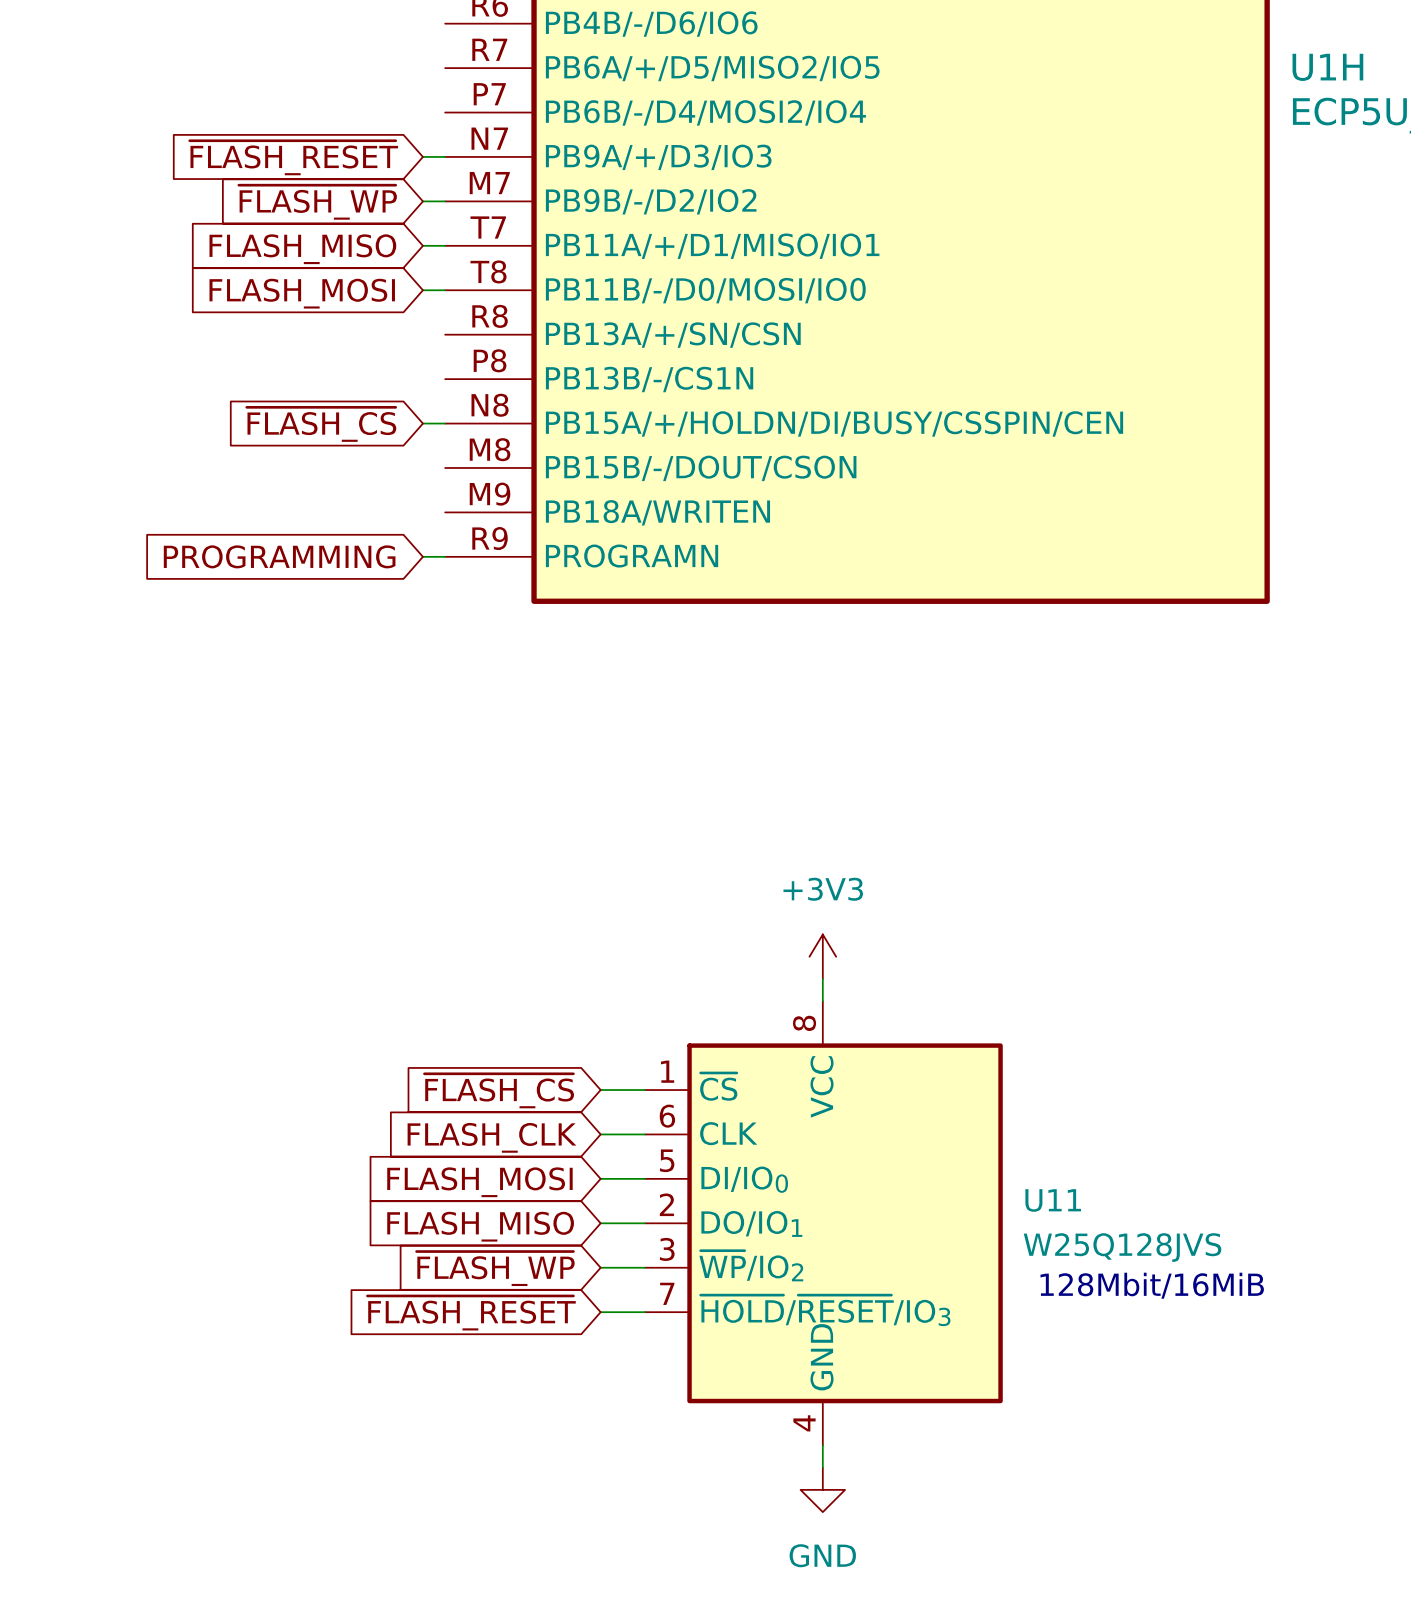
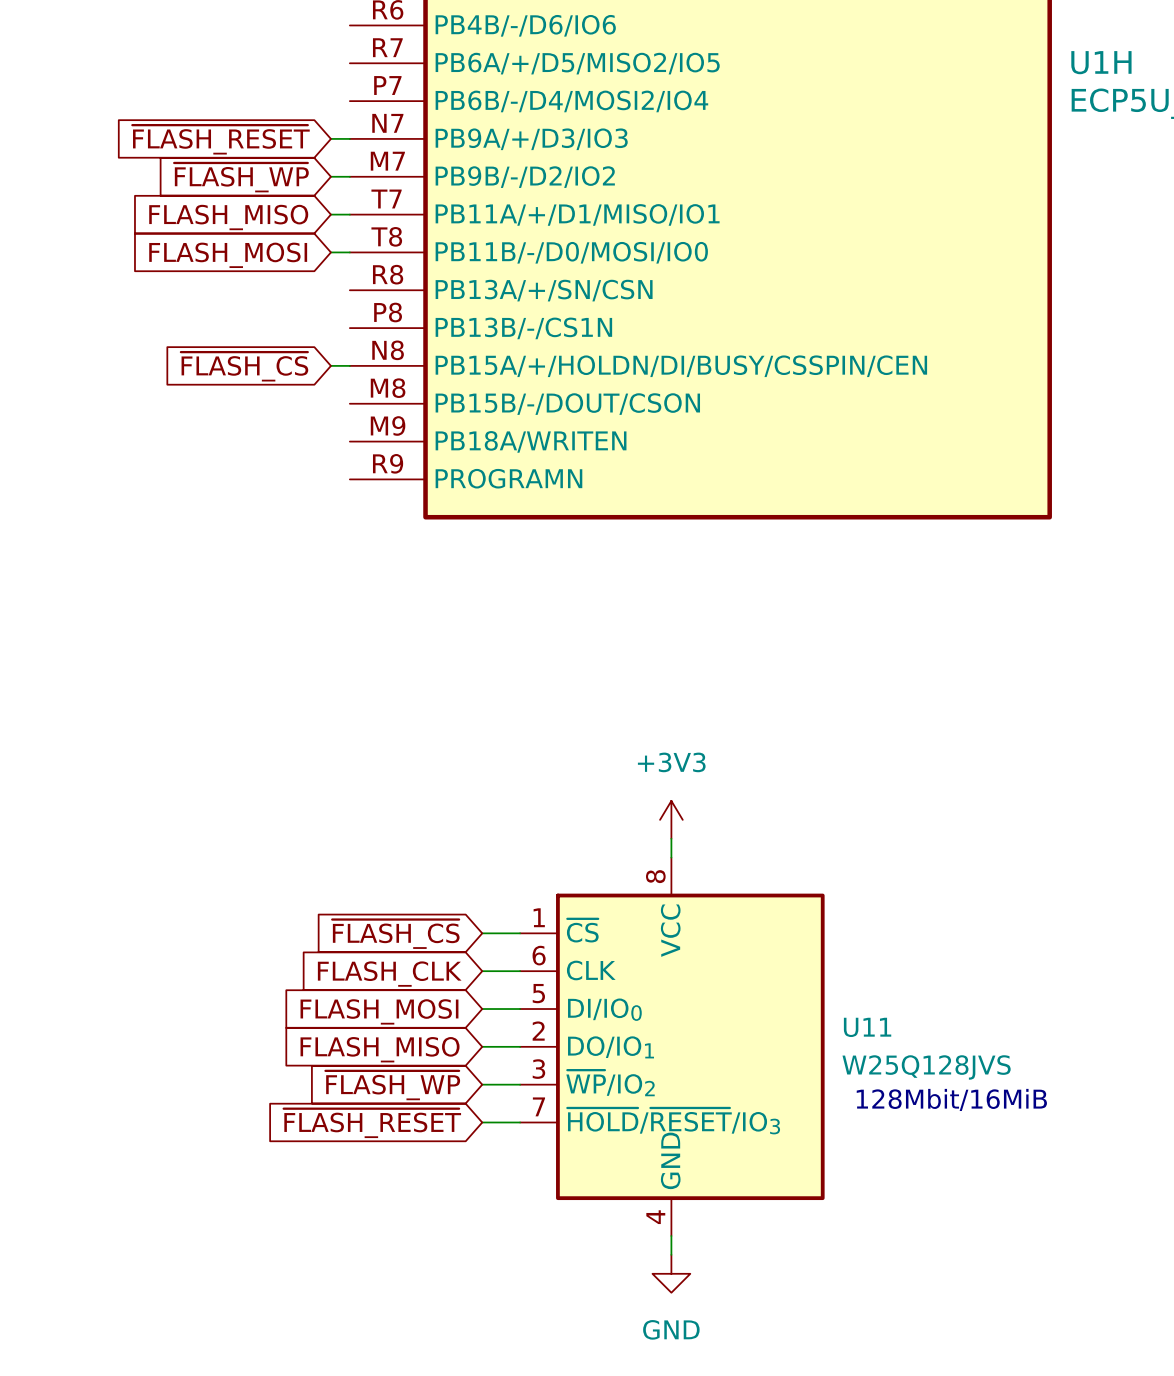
global label: PROGRAMMING (279, 556) -> none
wire: (422, 556) (445, 556) -> none

